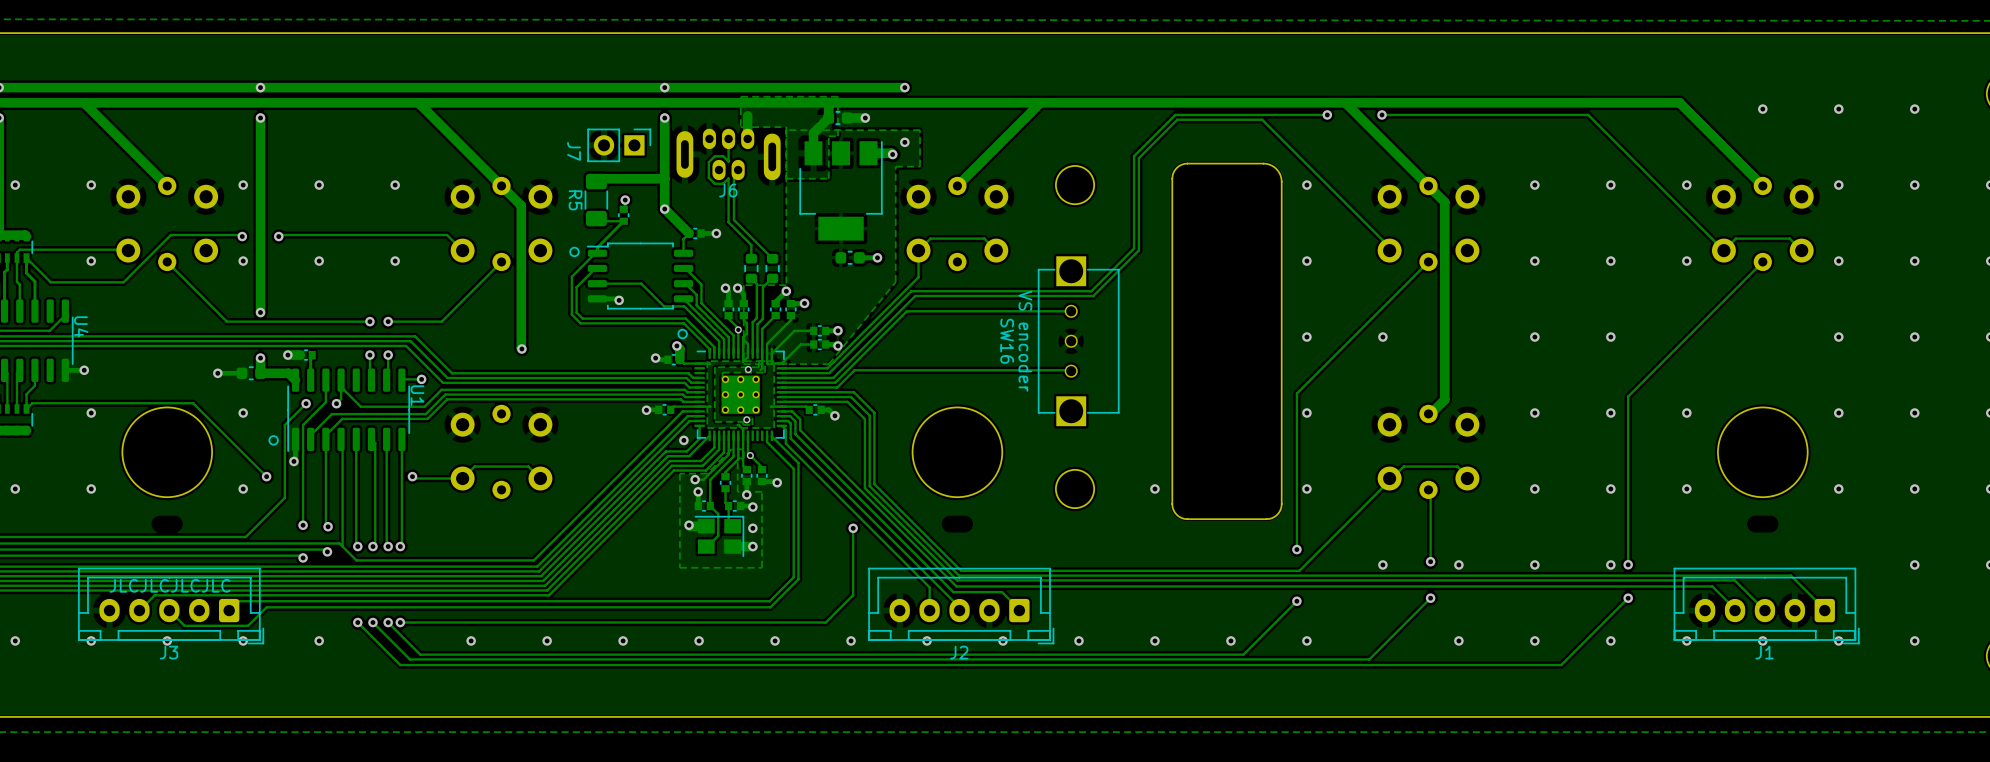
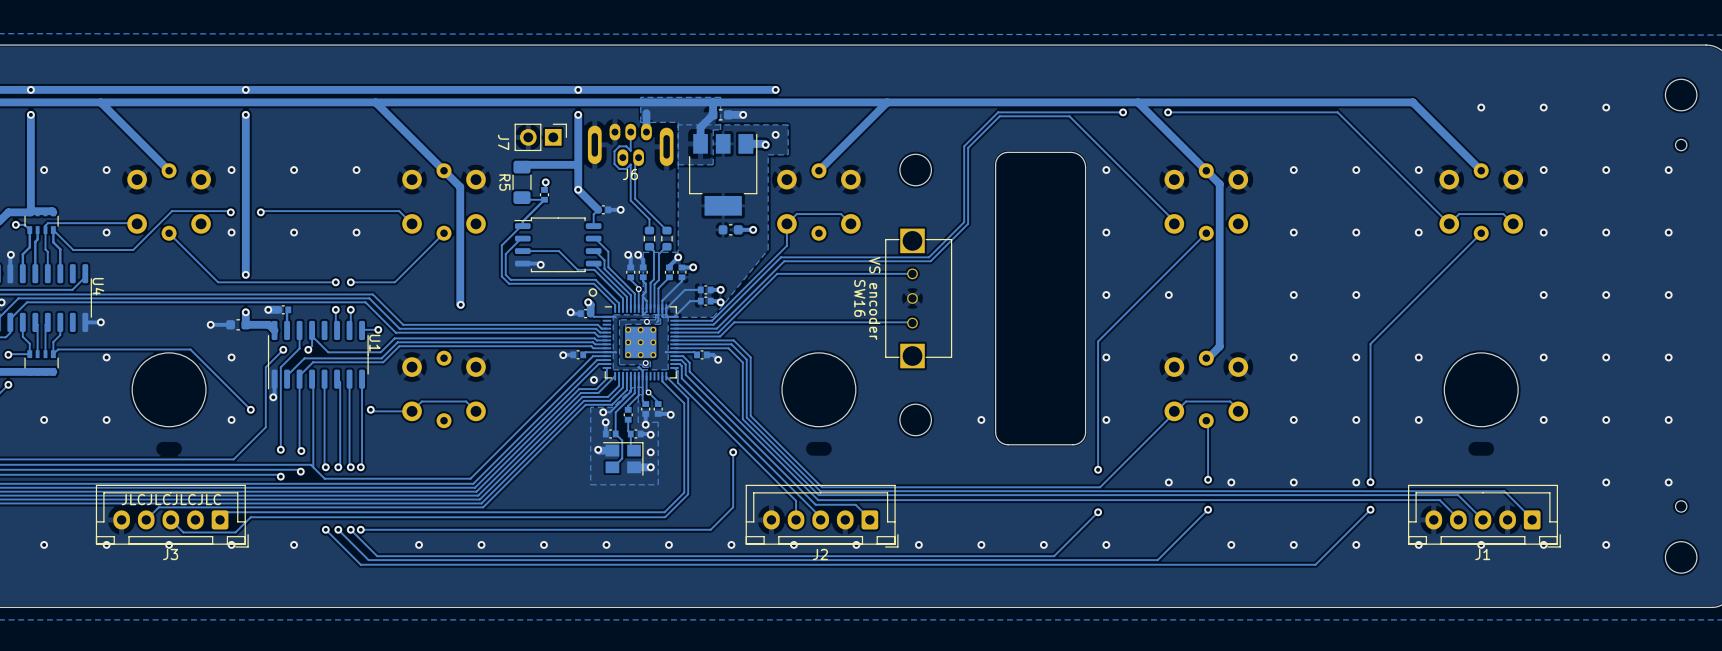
drawing: [569, 246, 580, 258] -> none
drawing: [268, 435, 279, 446] -> none

